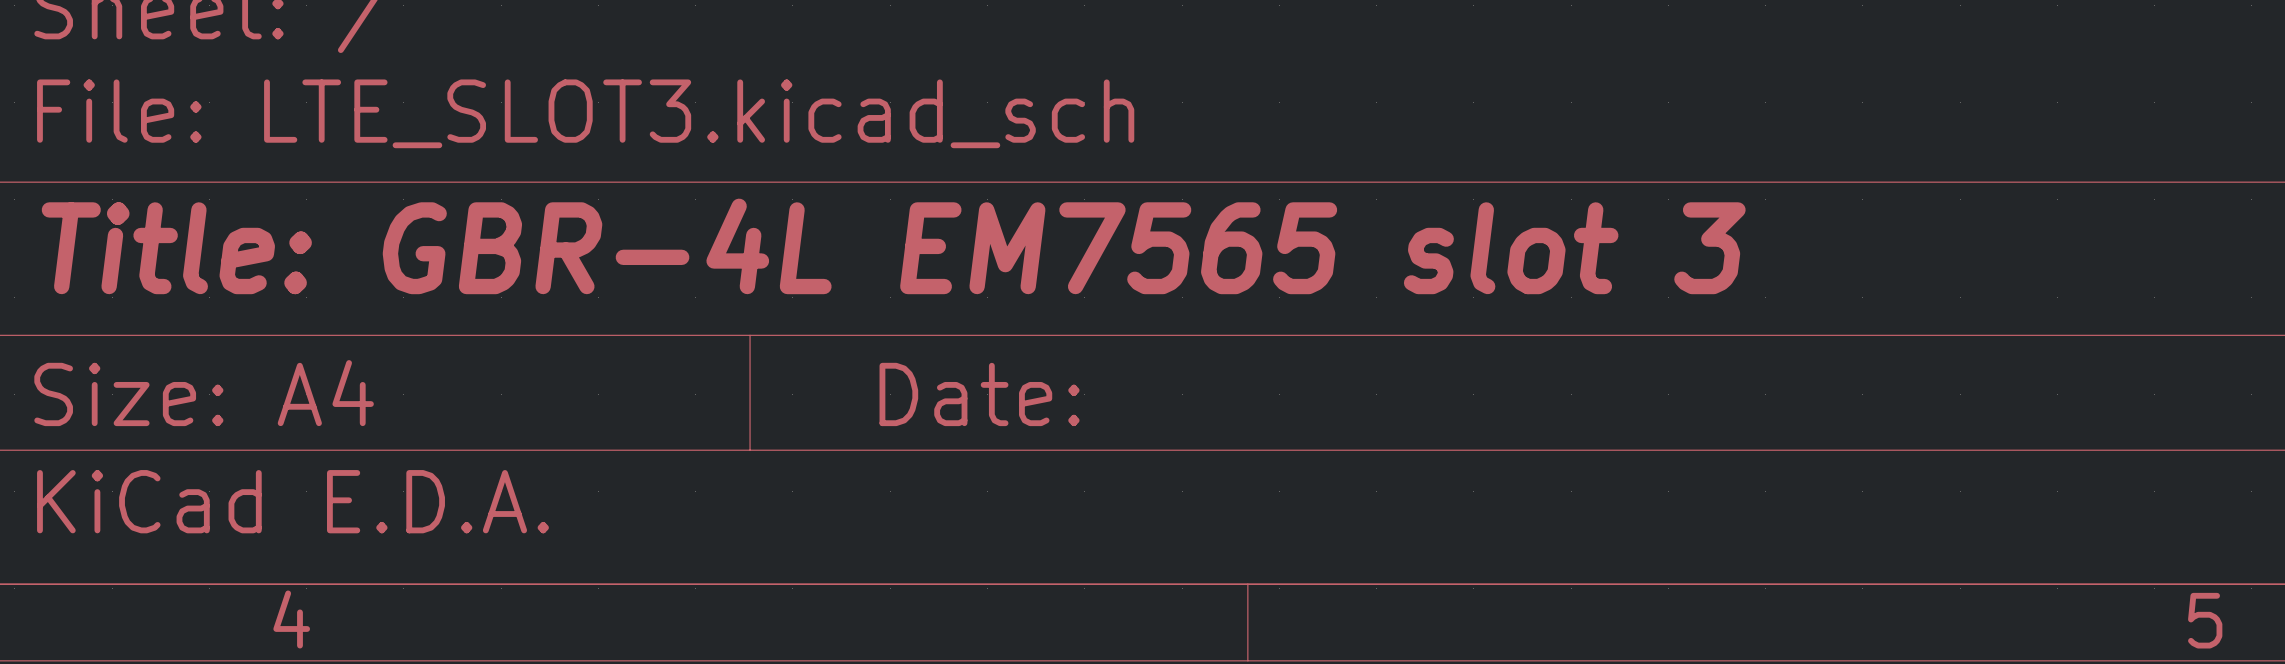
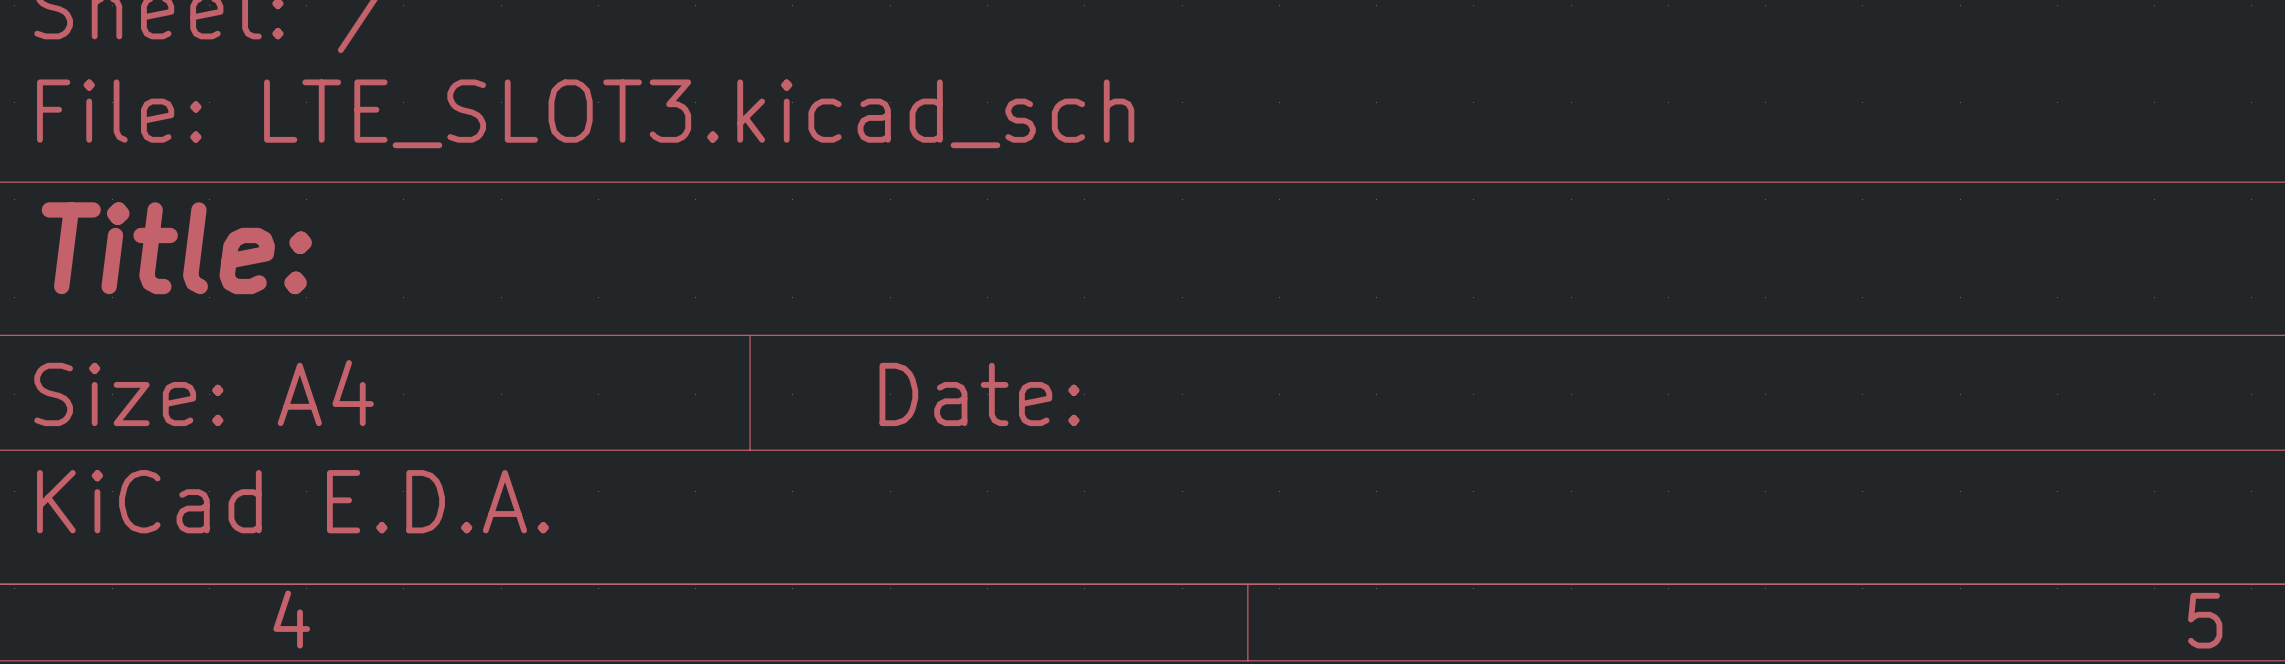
title block: Title: GBR-4L EM7565 slot 3 (893, 246) -> Title: (176, 248)

